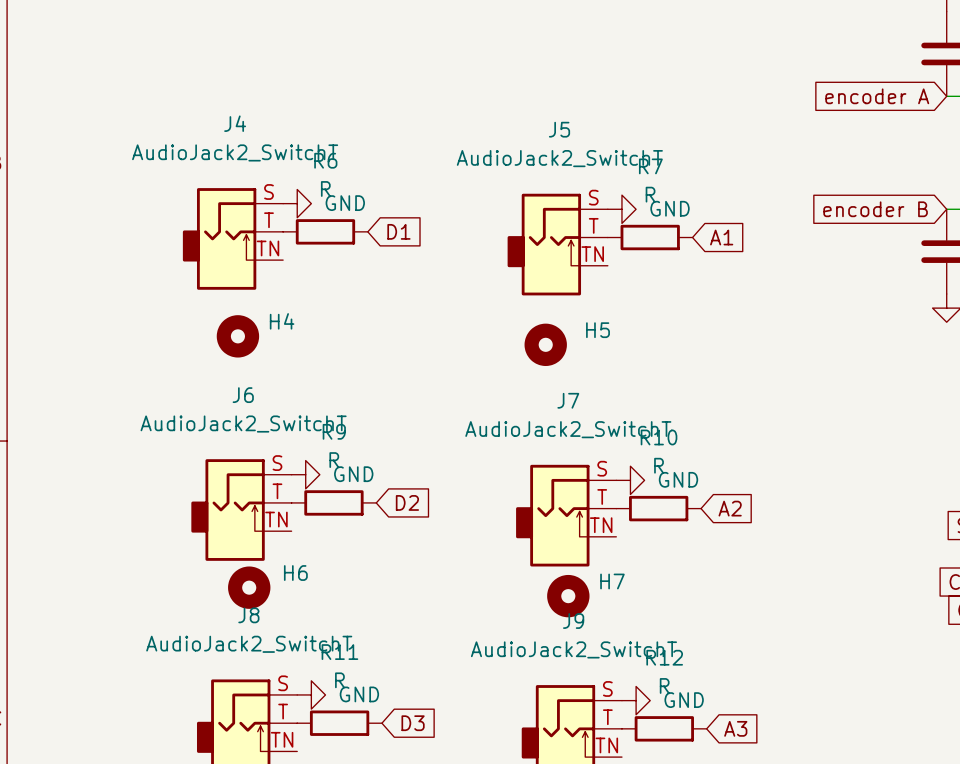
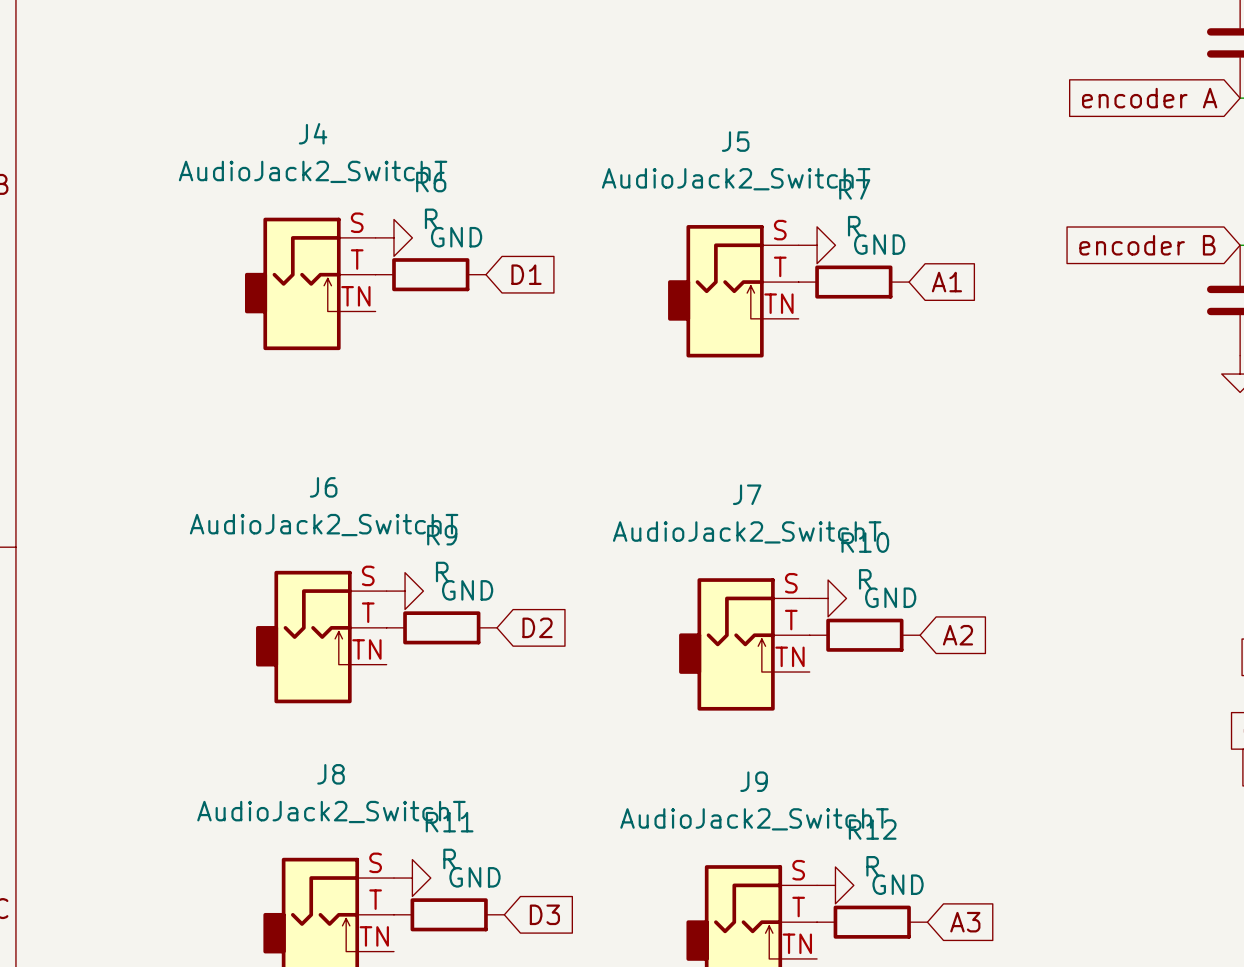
H4: (237, 336) -> none
H5: (545, 344) -> none
H6: (249, 587) -> none
H7: (568, 596) -> none

